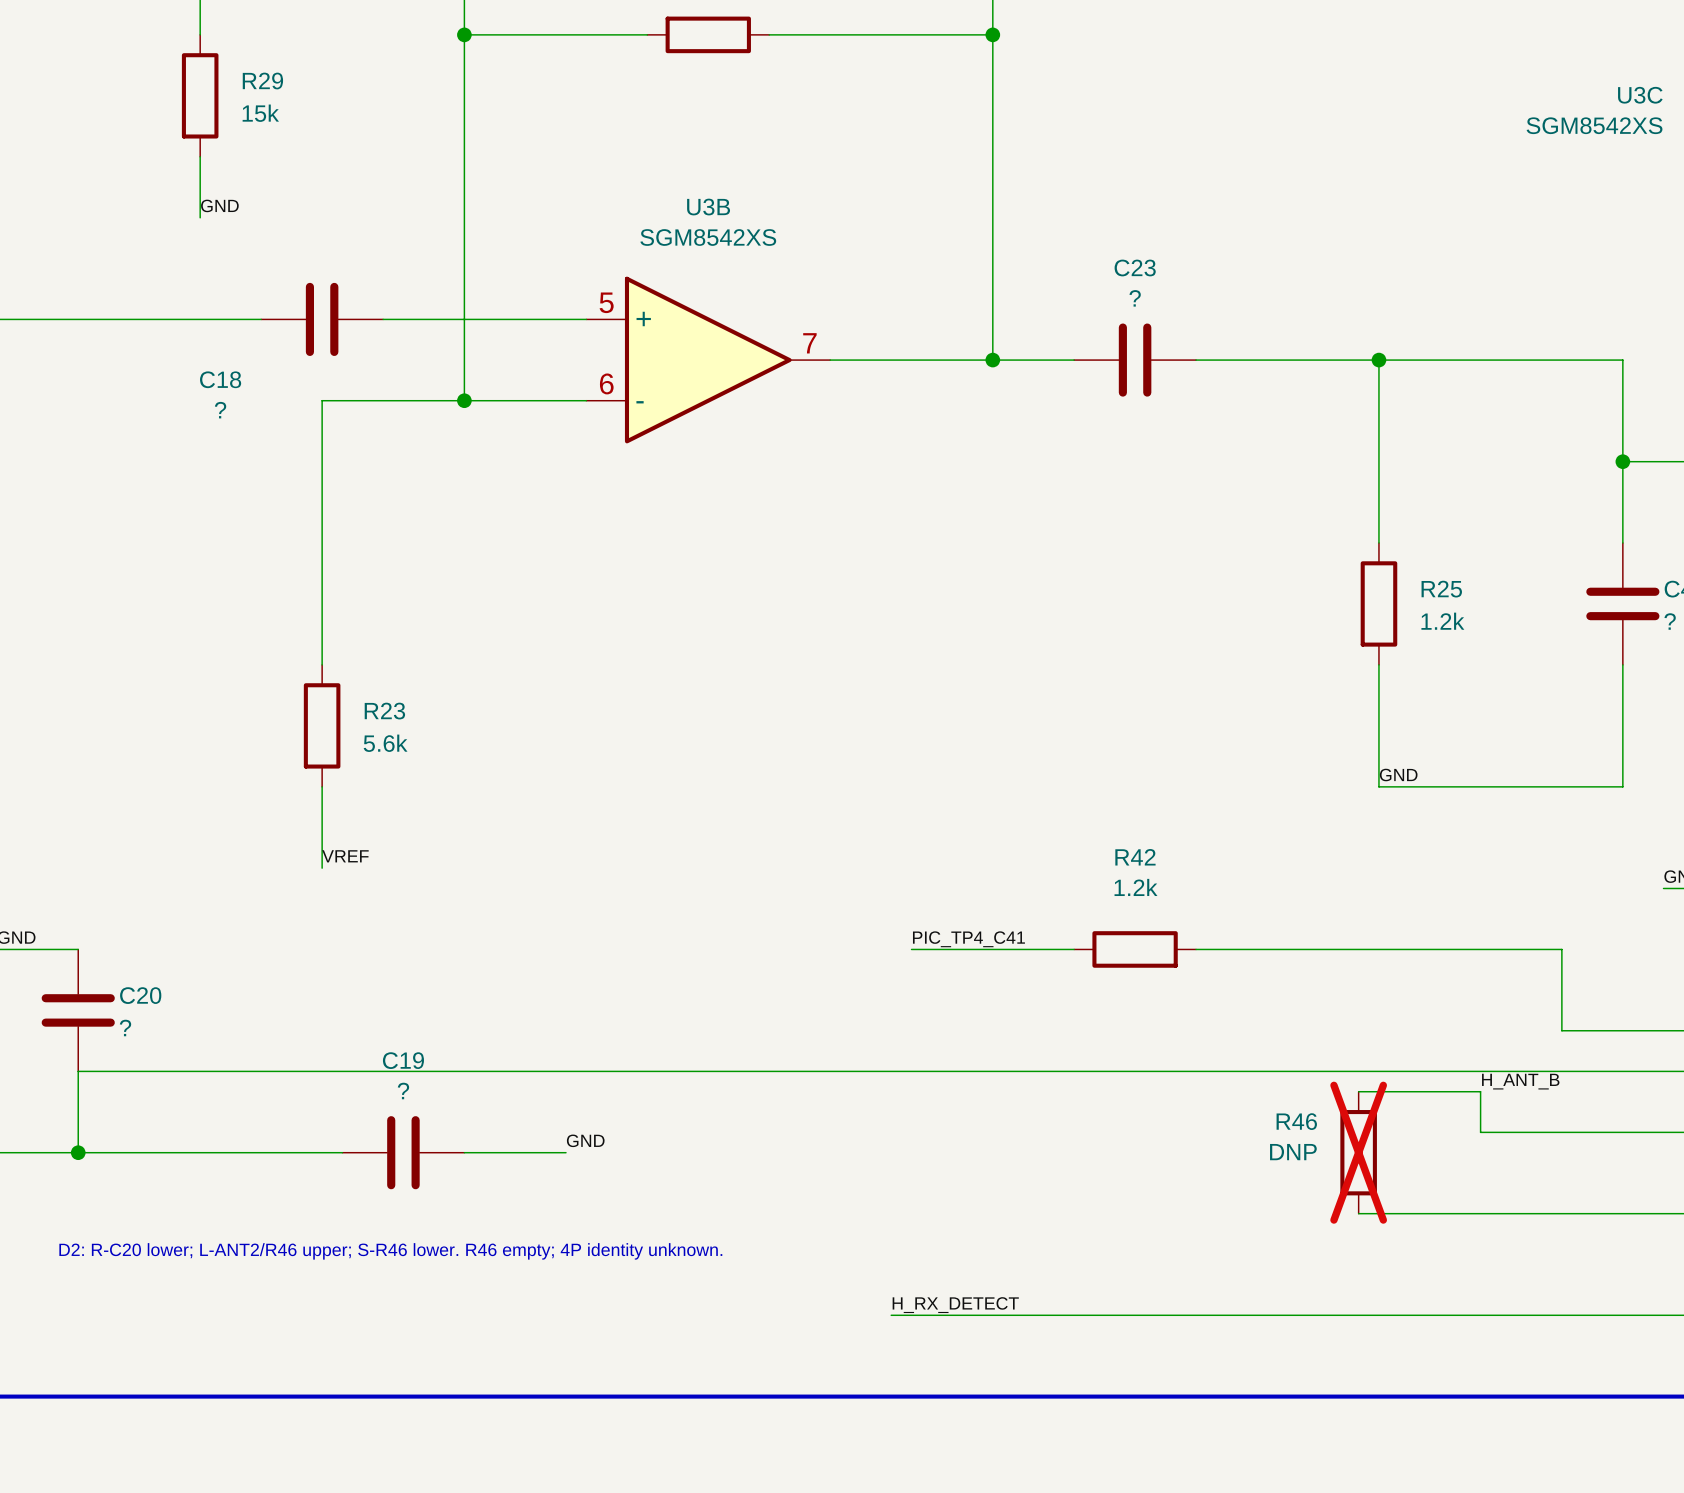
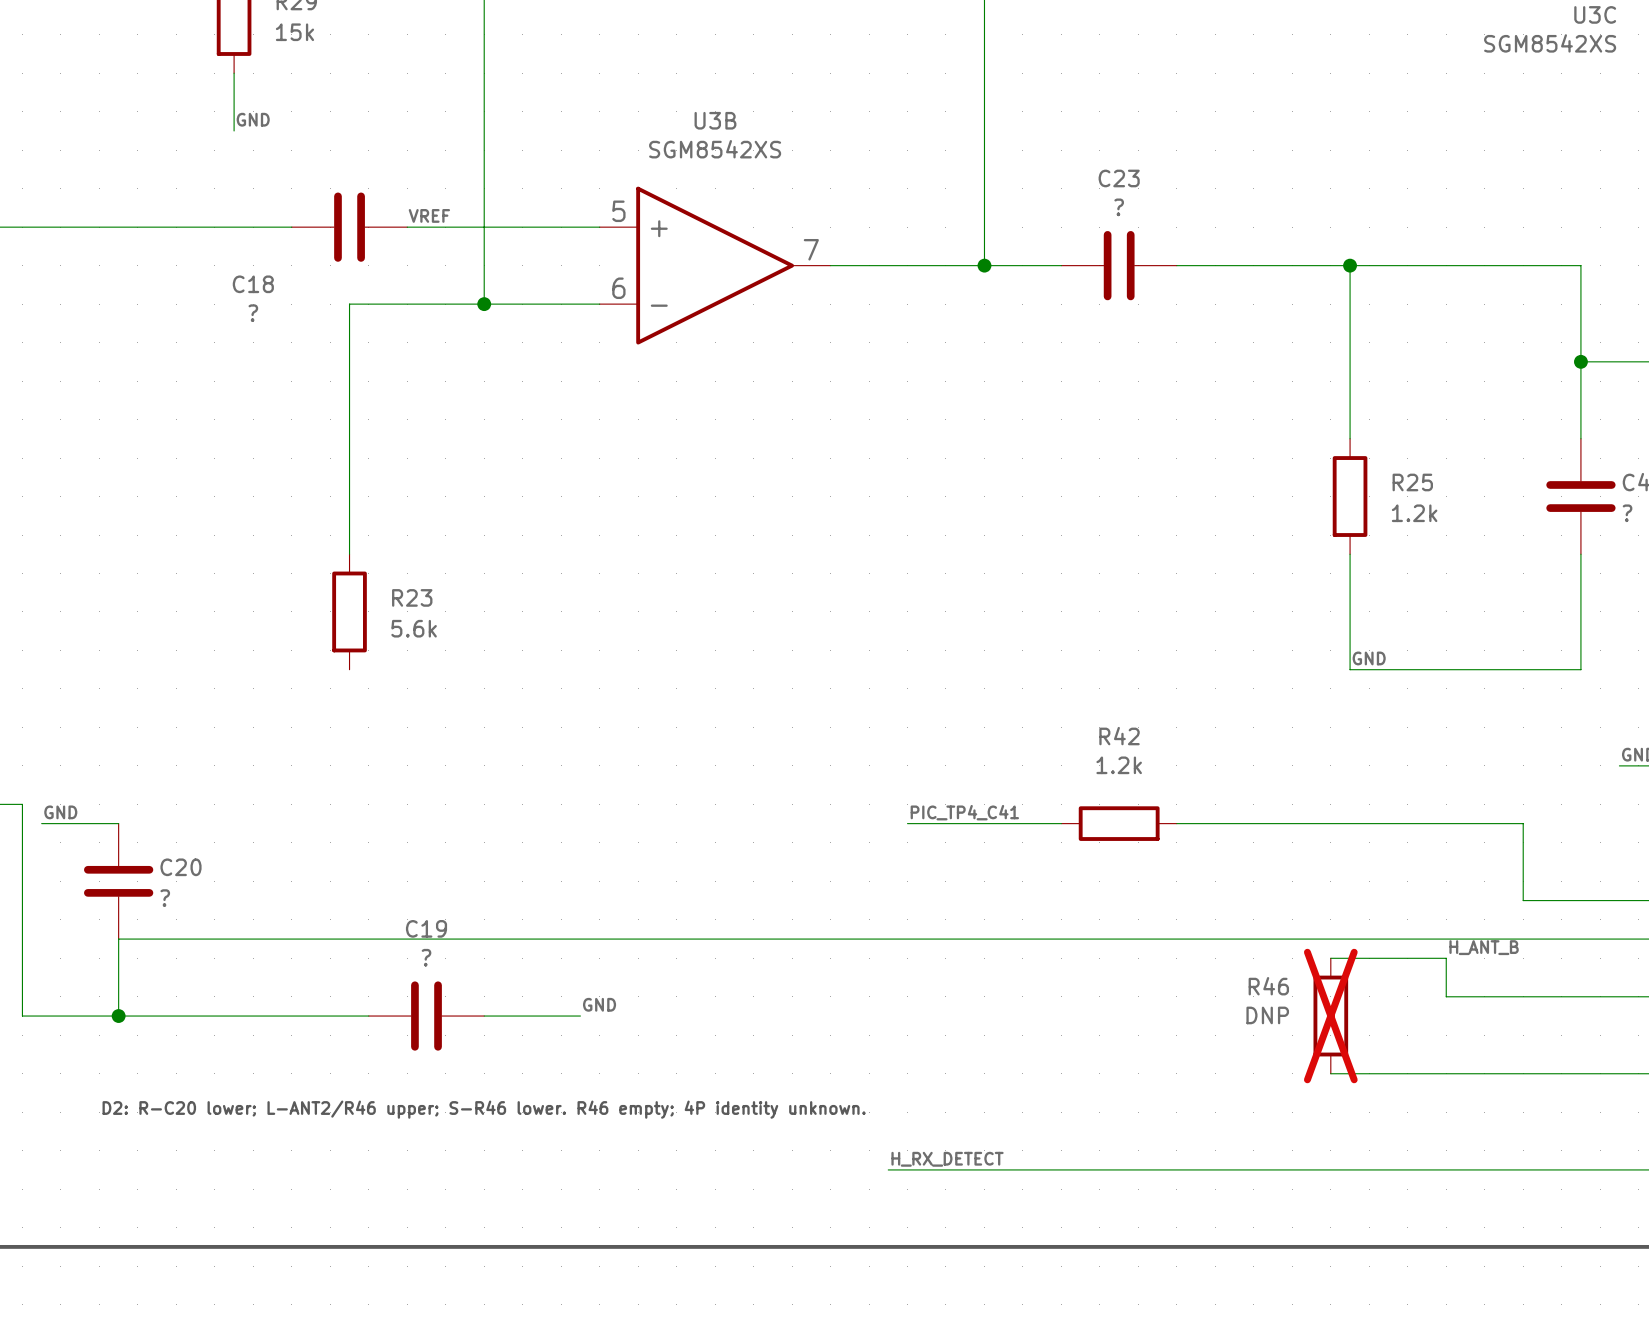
label: none -> VREF (429, 215)
wire: (322, 786) (322, 868) -> none
label: VREF (345, 856) -> none

